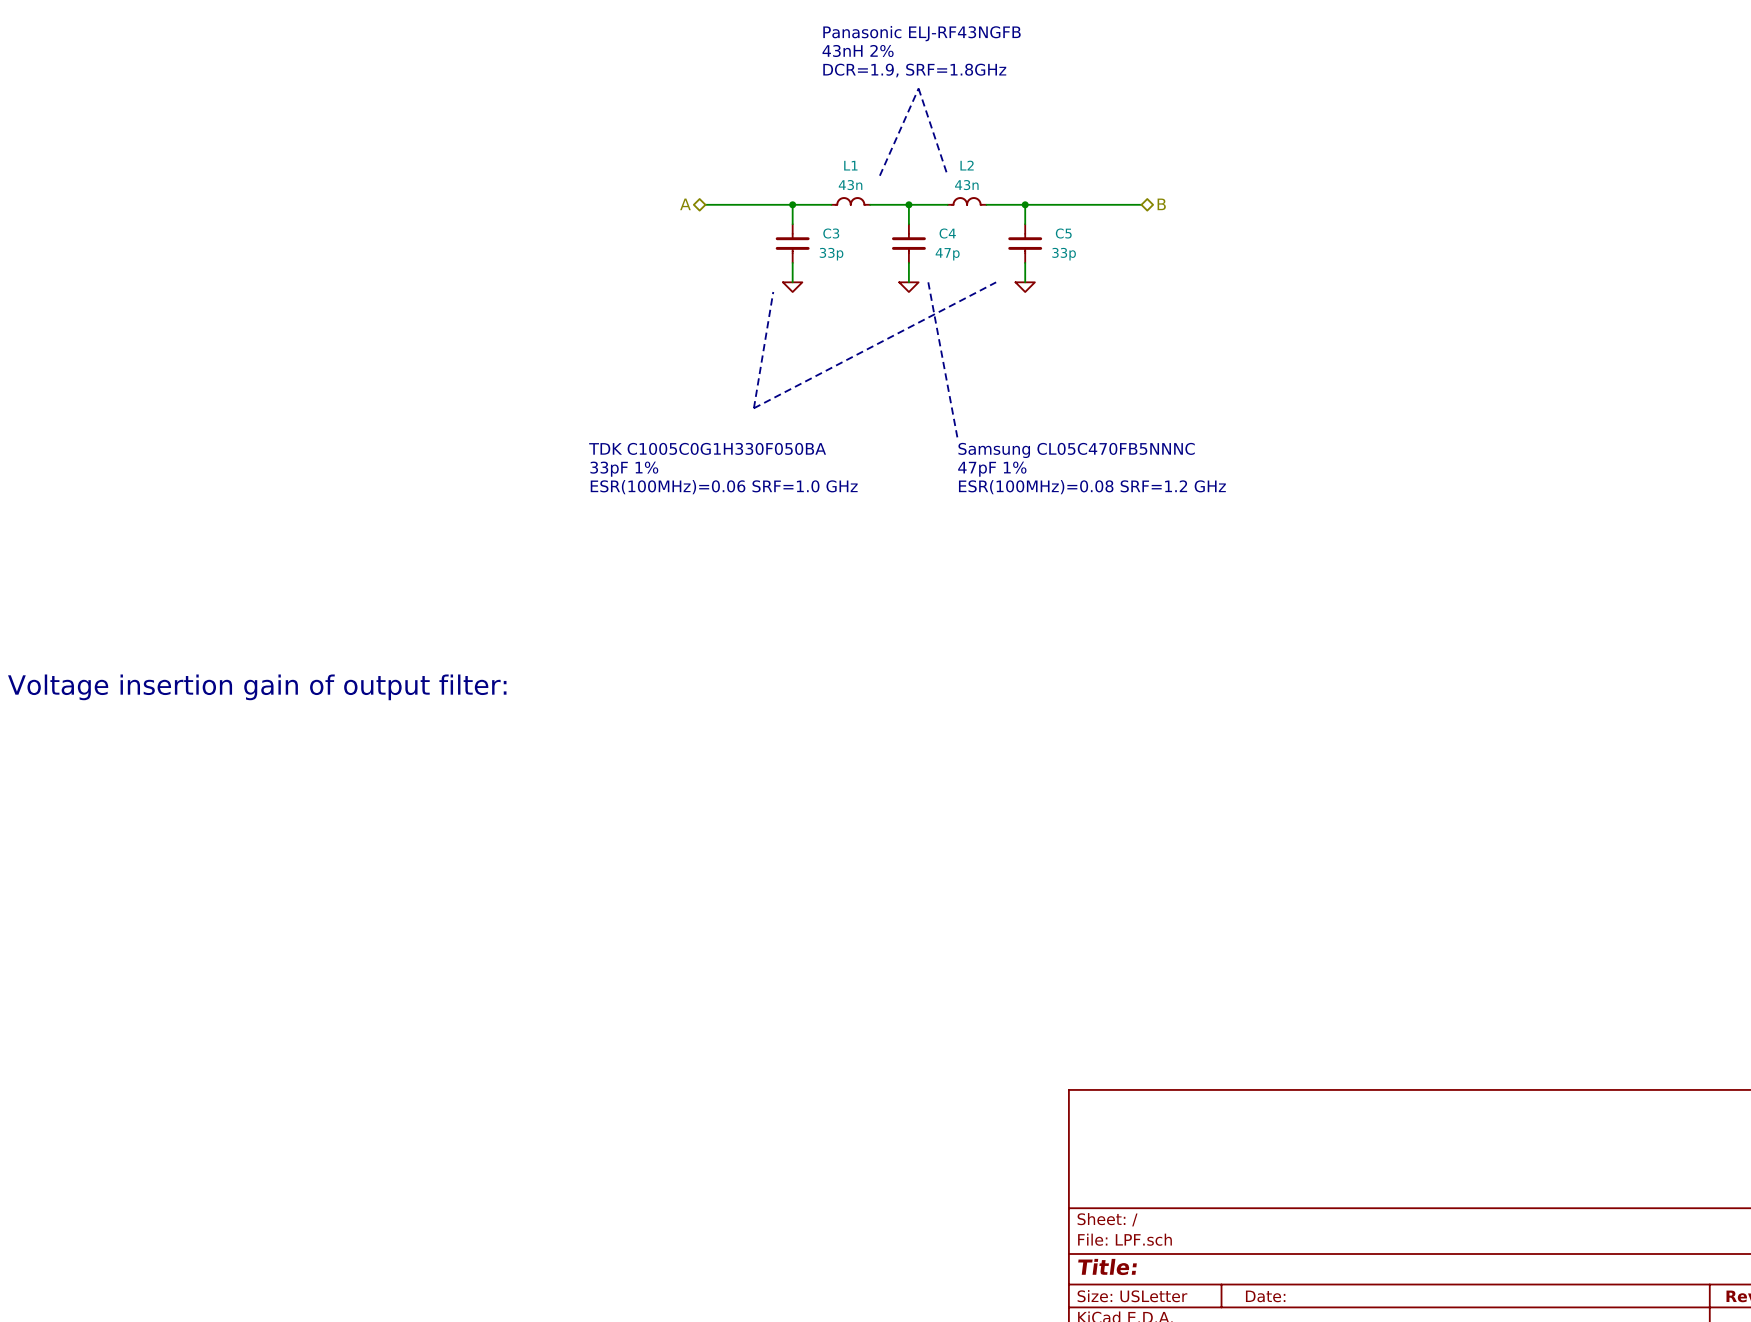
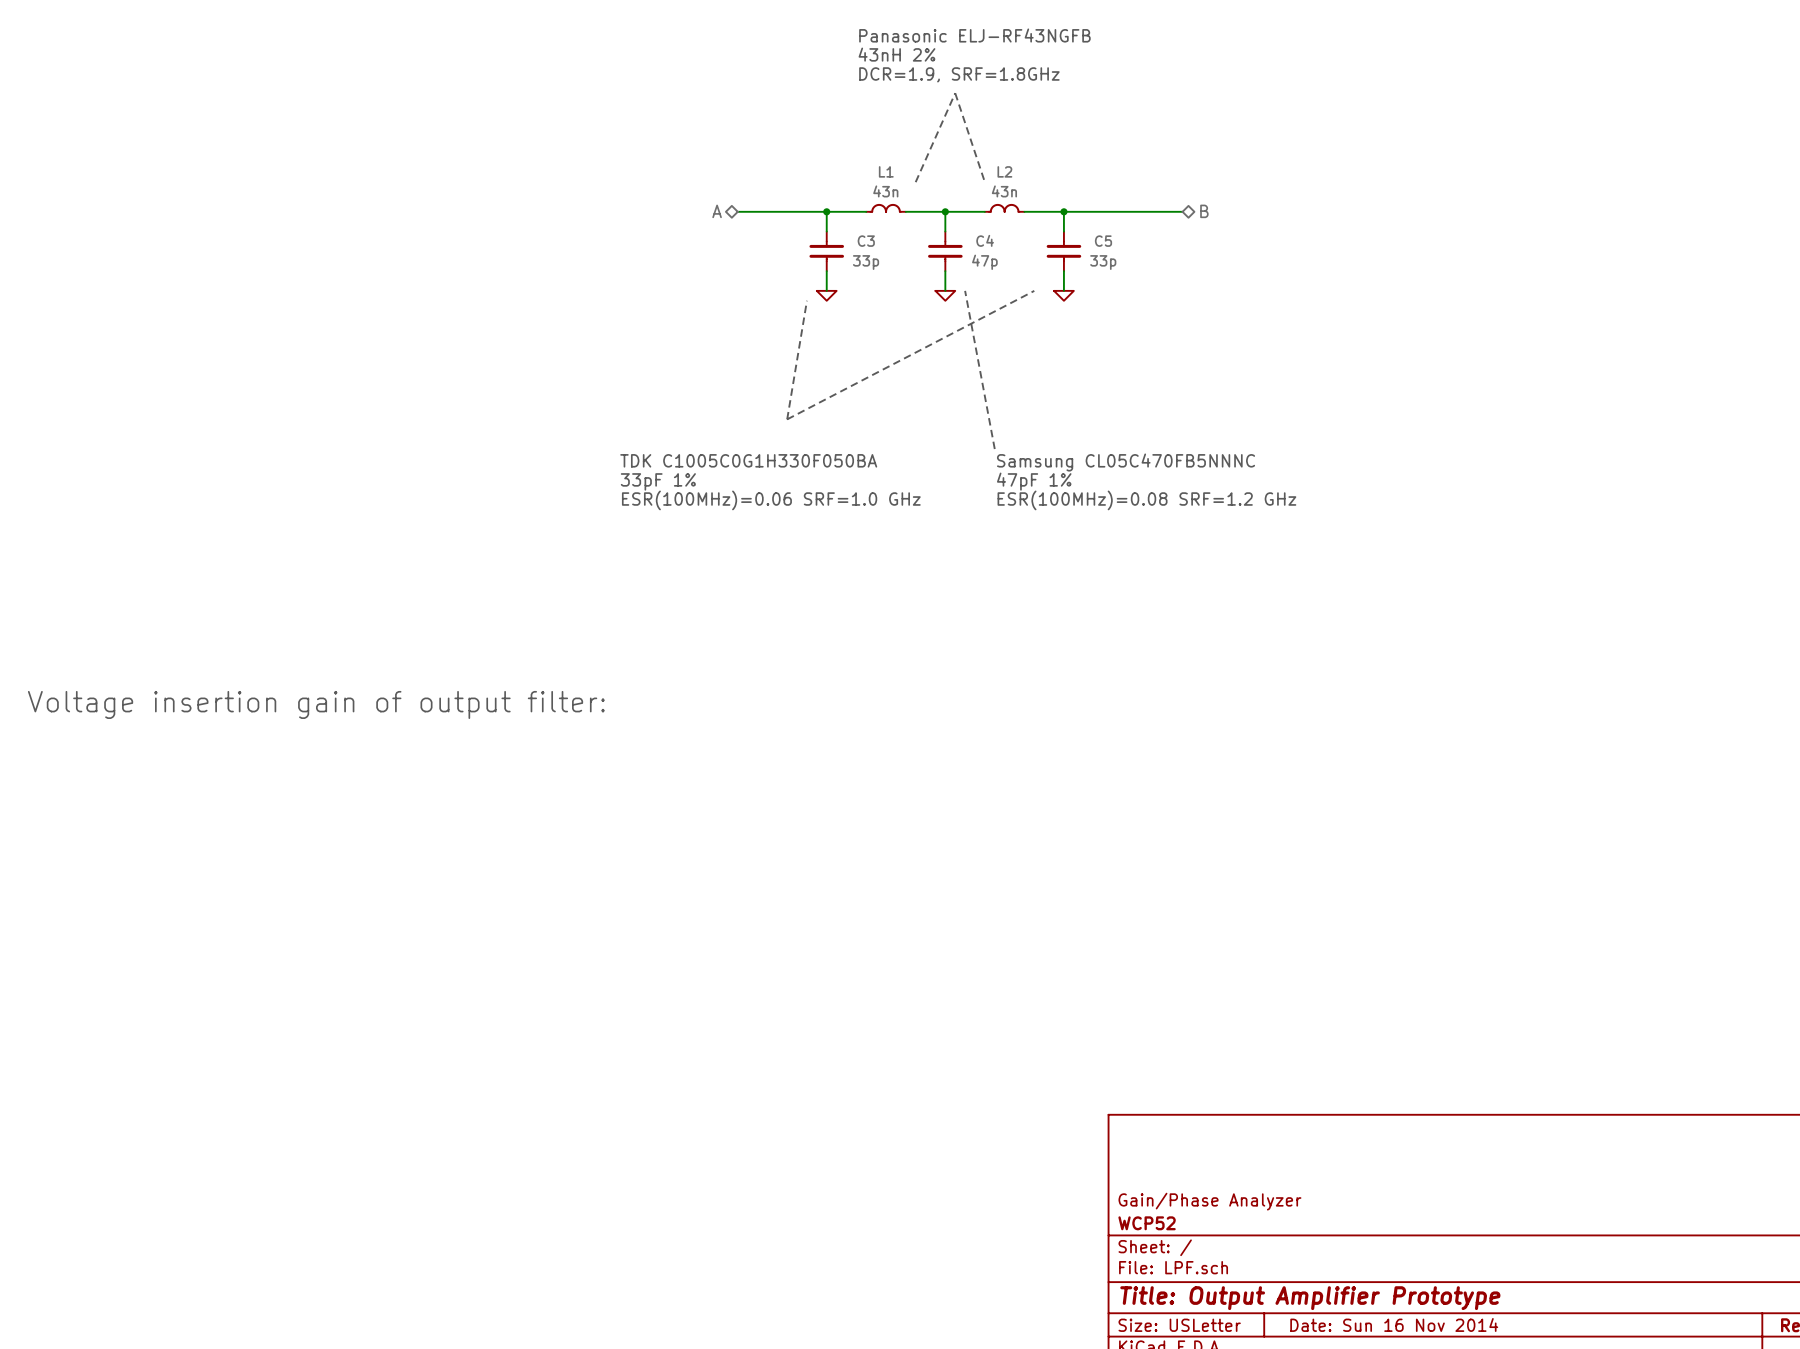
title block: none -> Gain/Phase Analyzer (1209, 1201)
title block: none -> WCP52 (1147, 1223)
title block: Title: (1107, 1266) -> Title: Output Amplifier Prototype (1310, 1298)
title block: Date: (1265, 1296) -> Date: Sun 16 Nov 2014 (1394, 1324)

